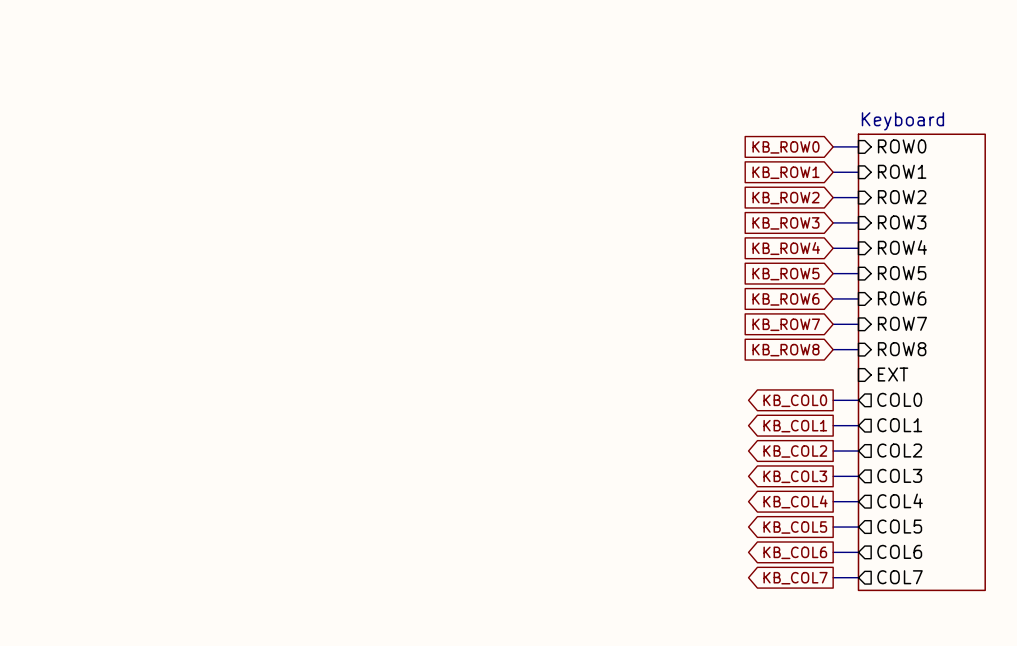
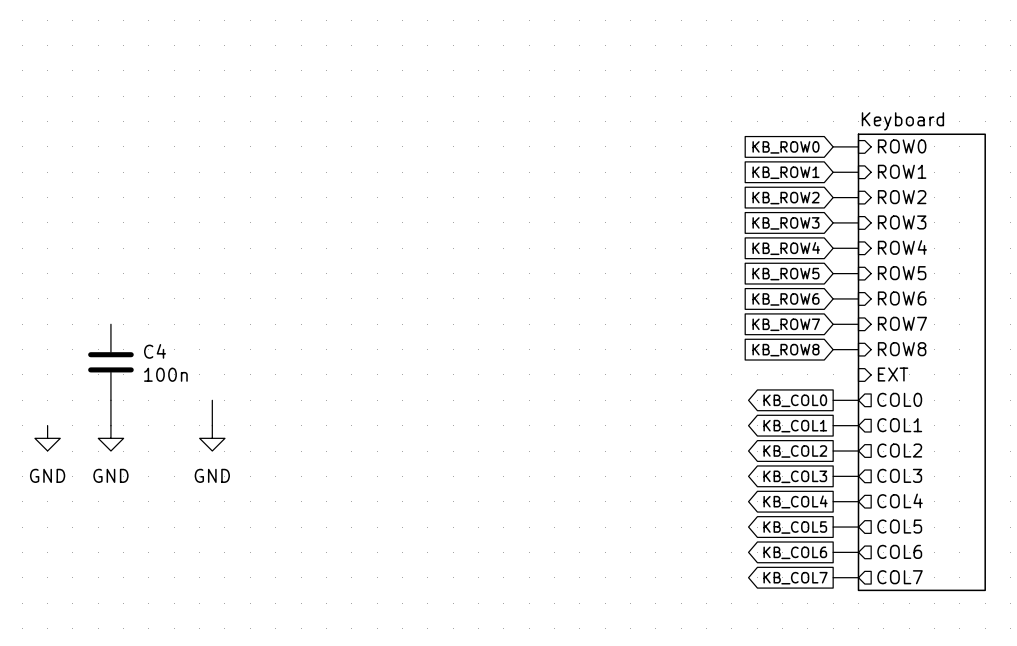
C4: none -> 100n (110, 362)
wire: none -> (110, 400) (110, 425)
wire: none -> (212, 400) (212, 425)
power symbol: none -> GND (47, 438)
power symbol: none -> GND (110, 438)
power symbol: none -> GND (212, 438)

